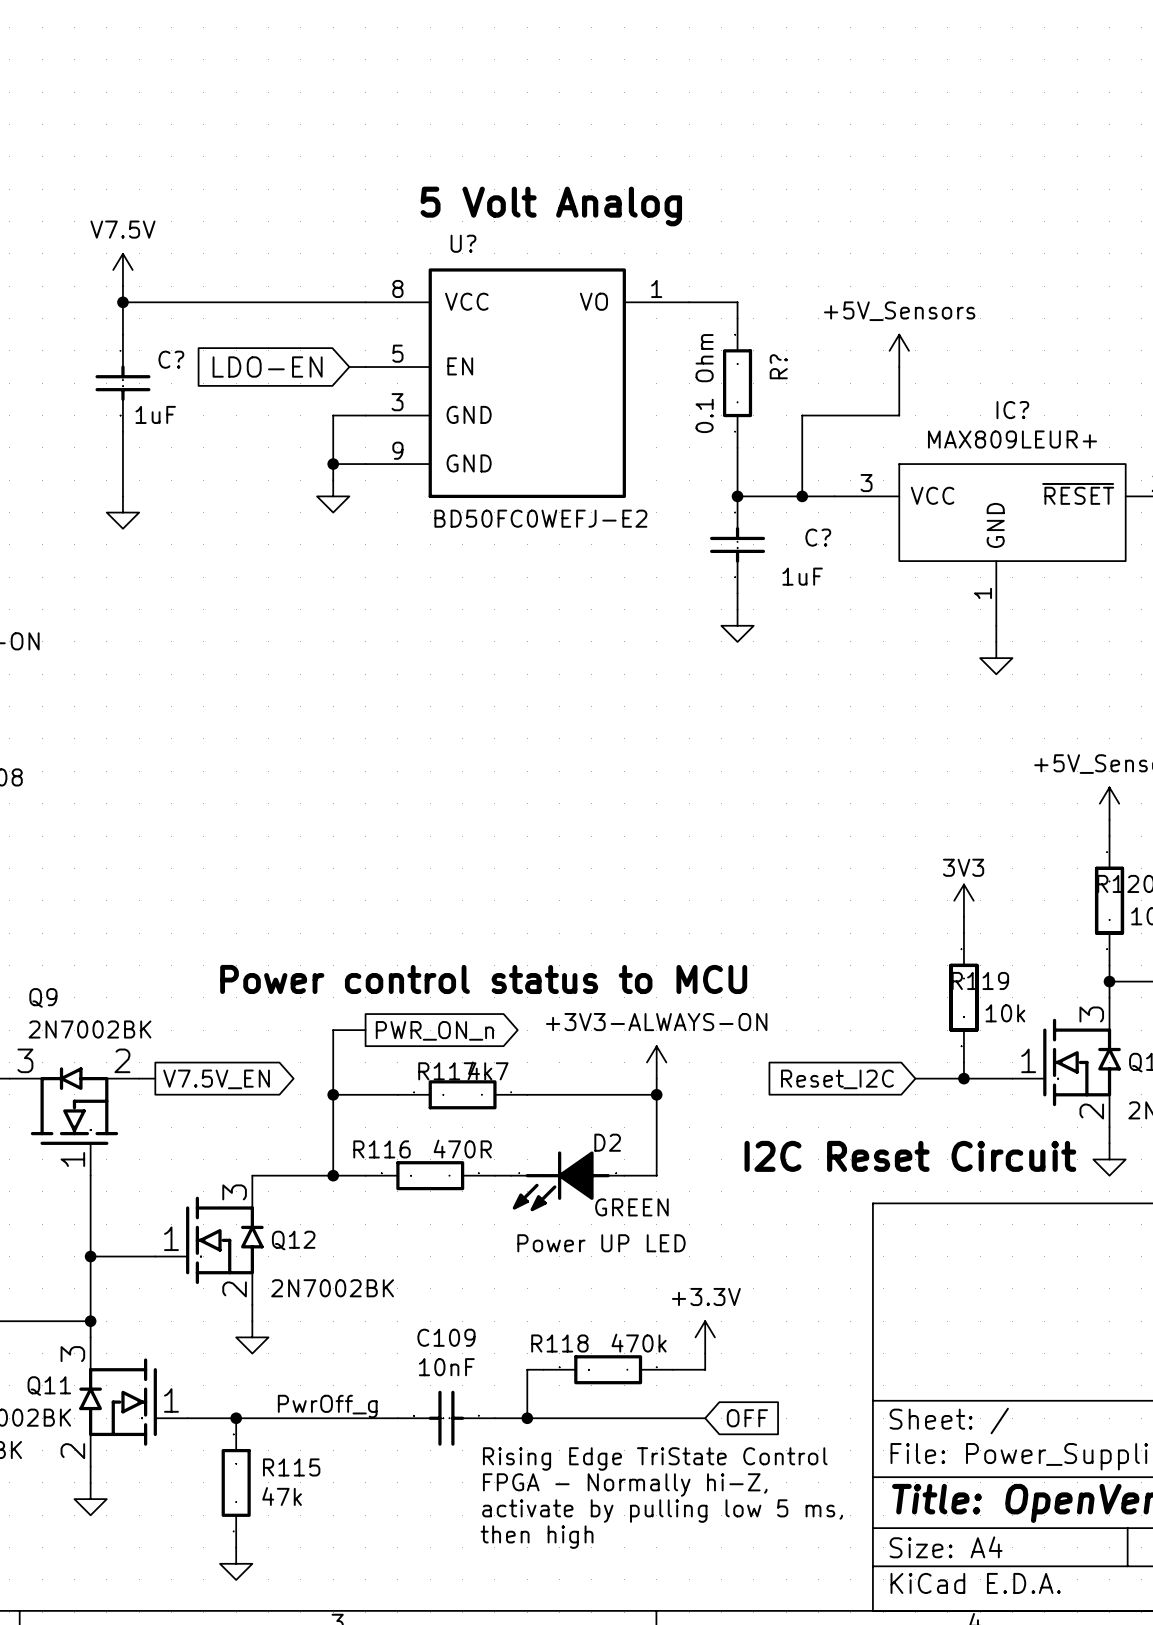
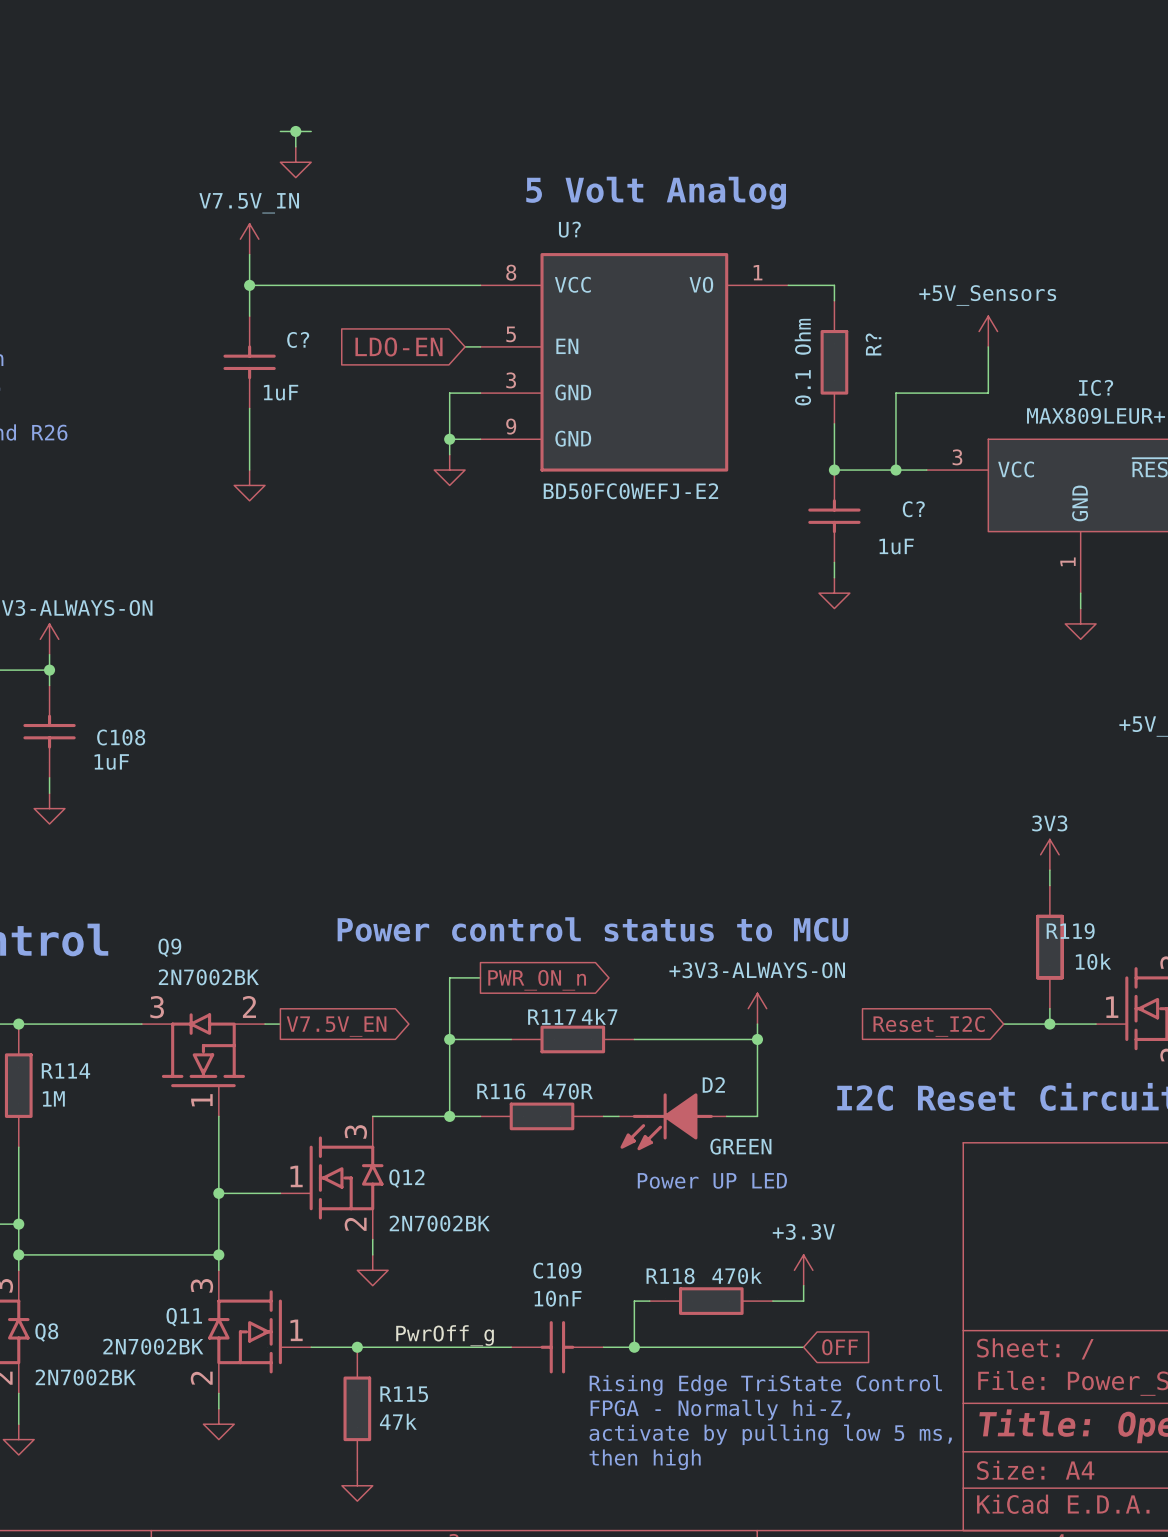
wire: none -> (280, 131) (311, 131)
wire: none -> (295, 131) (295, 146)
junction: none -> (295, 131)
power symbol: none -> (295, 162)
power symbol: none -> V7.5V_IN (249, 239)
power symbol: V7.5V (122, 269) -> none

